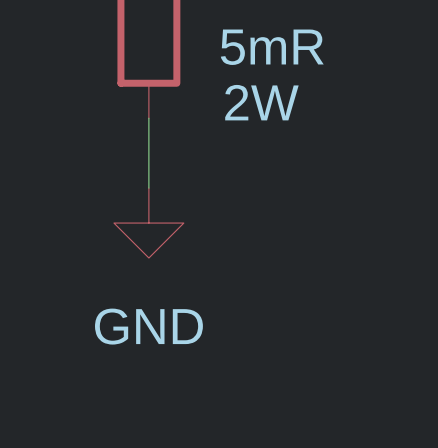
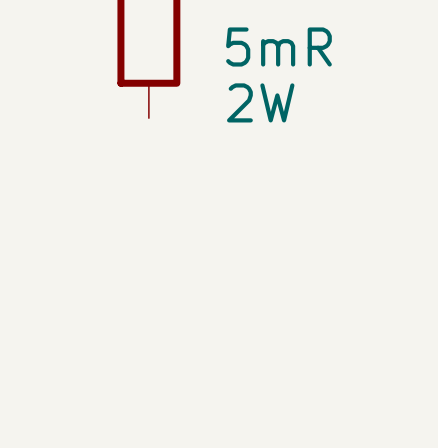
wire: (148, 118) (148, 188) -> none
power symbol: GND (148, 223) -> none

